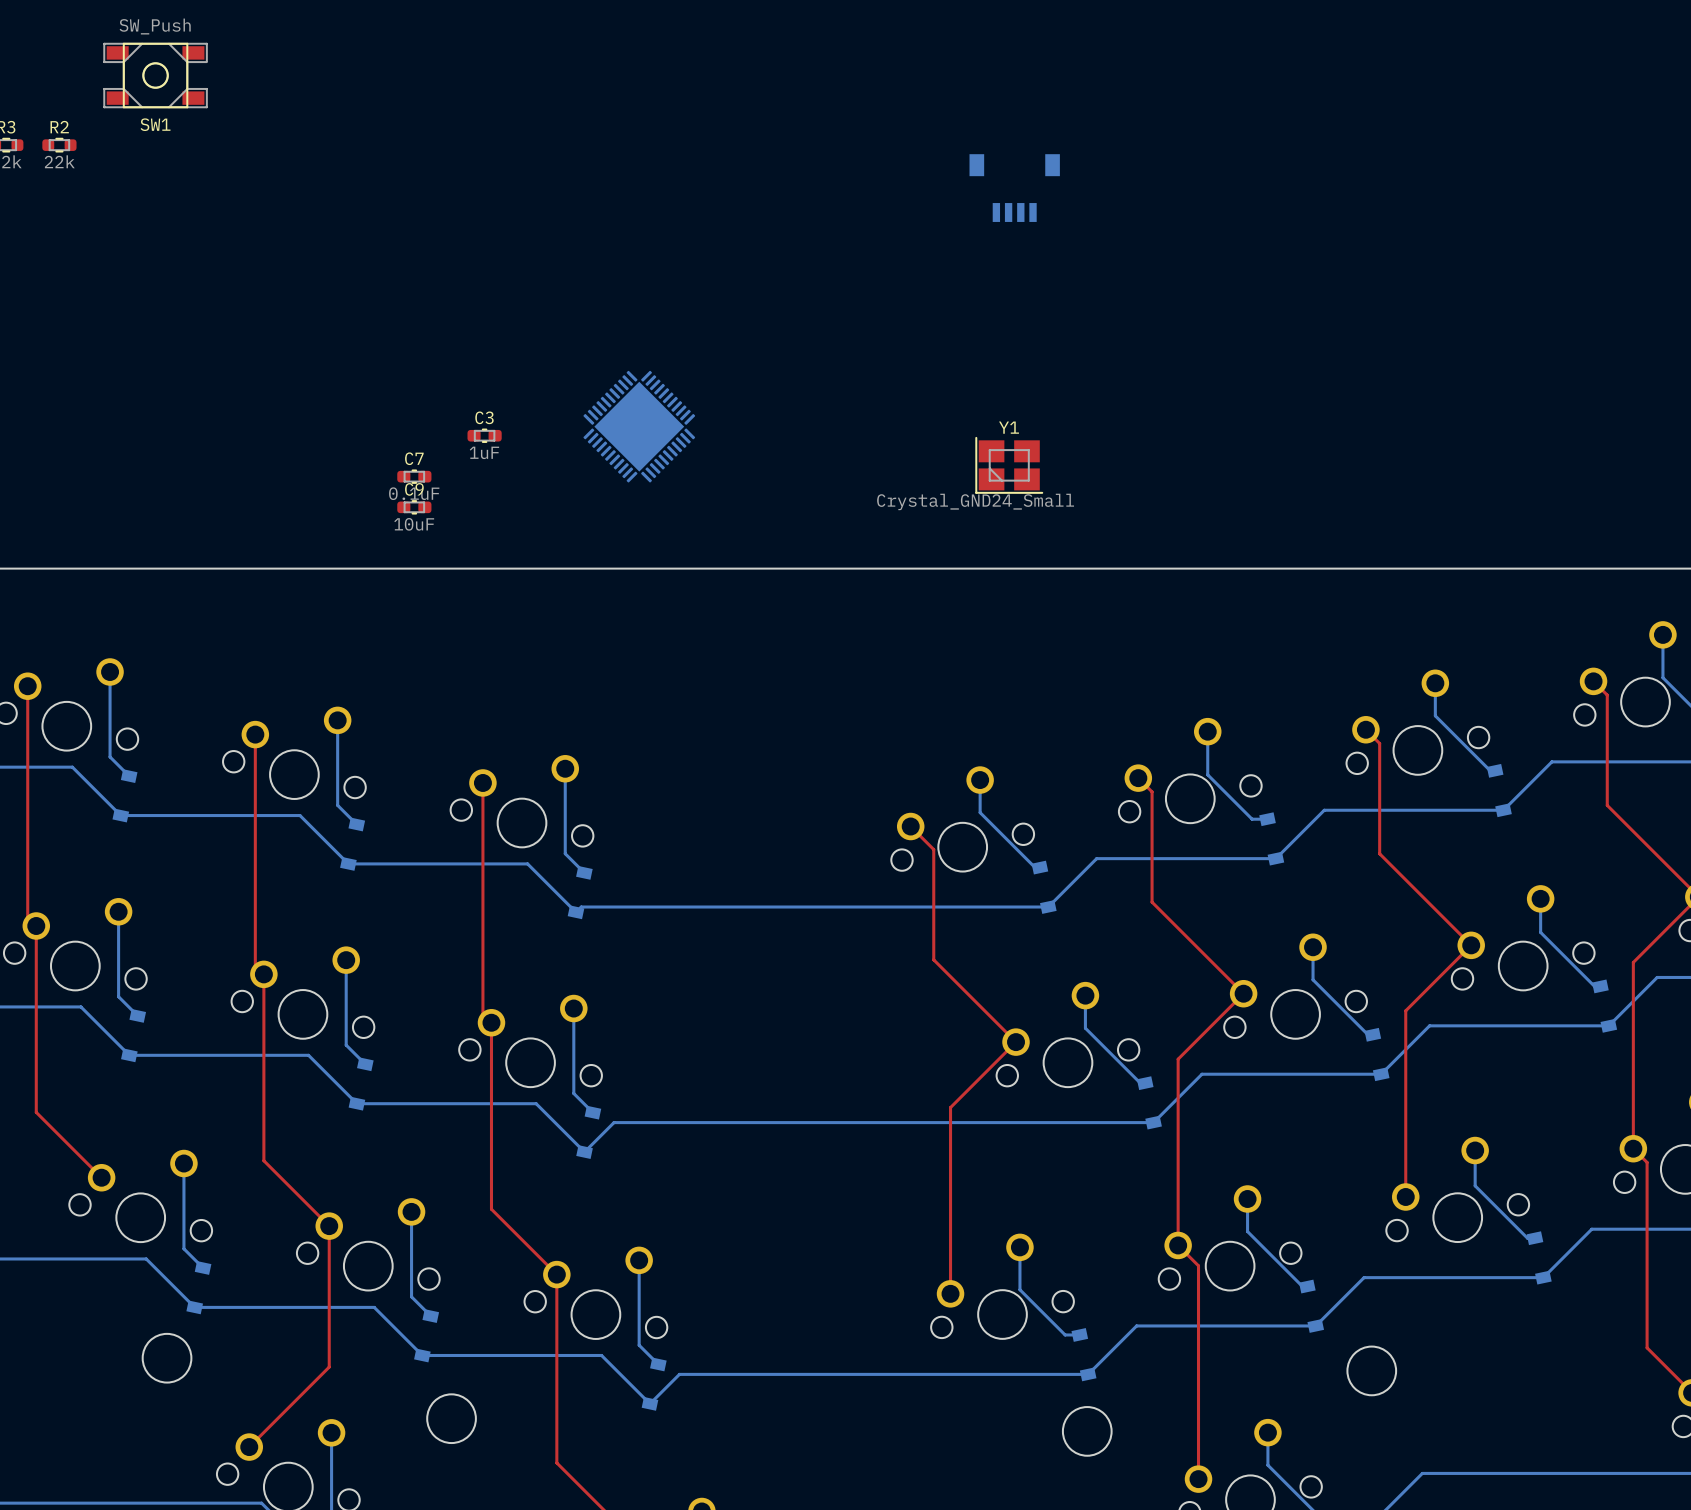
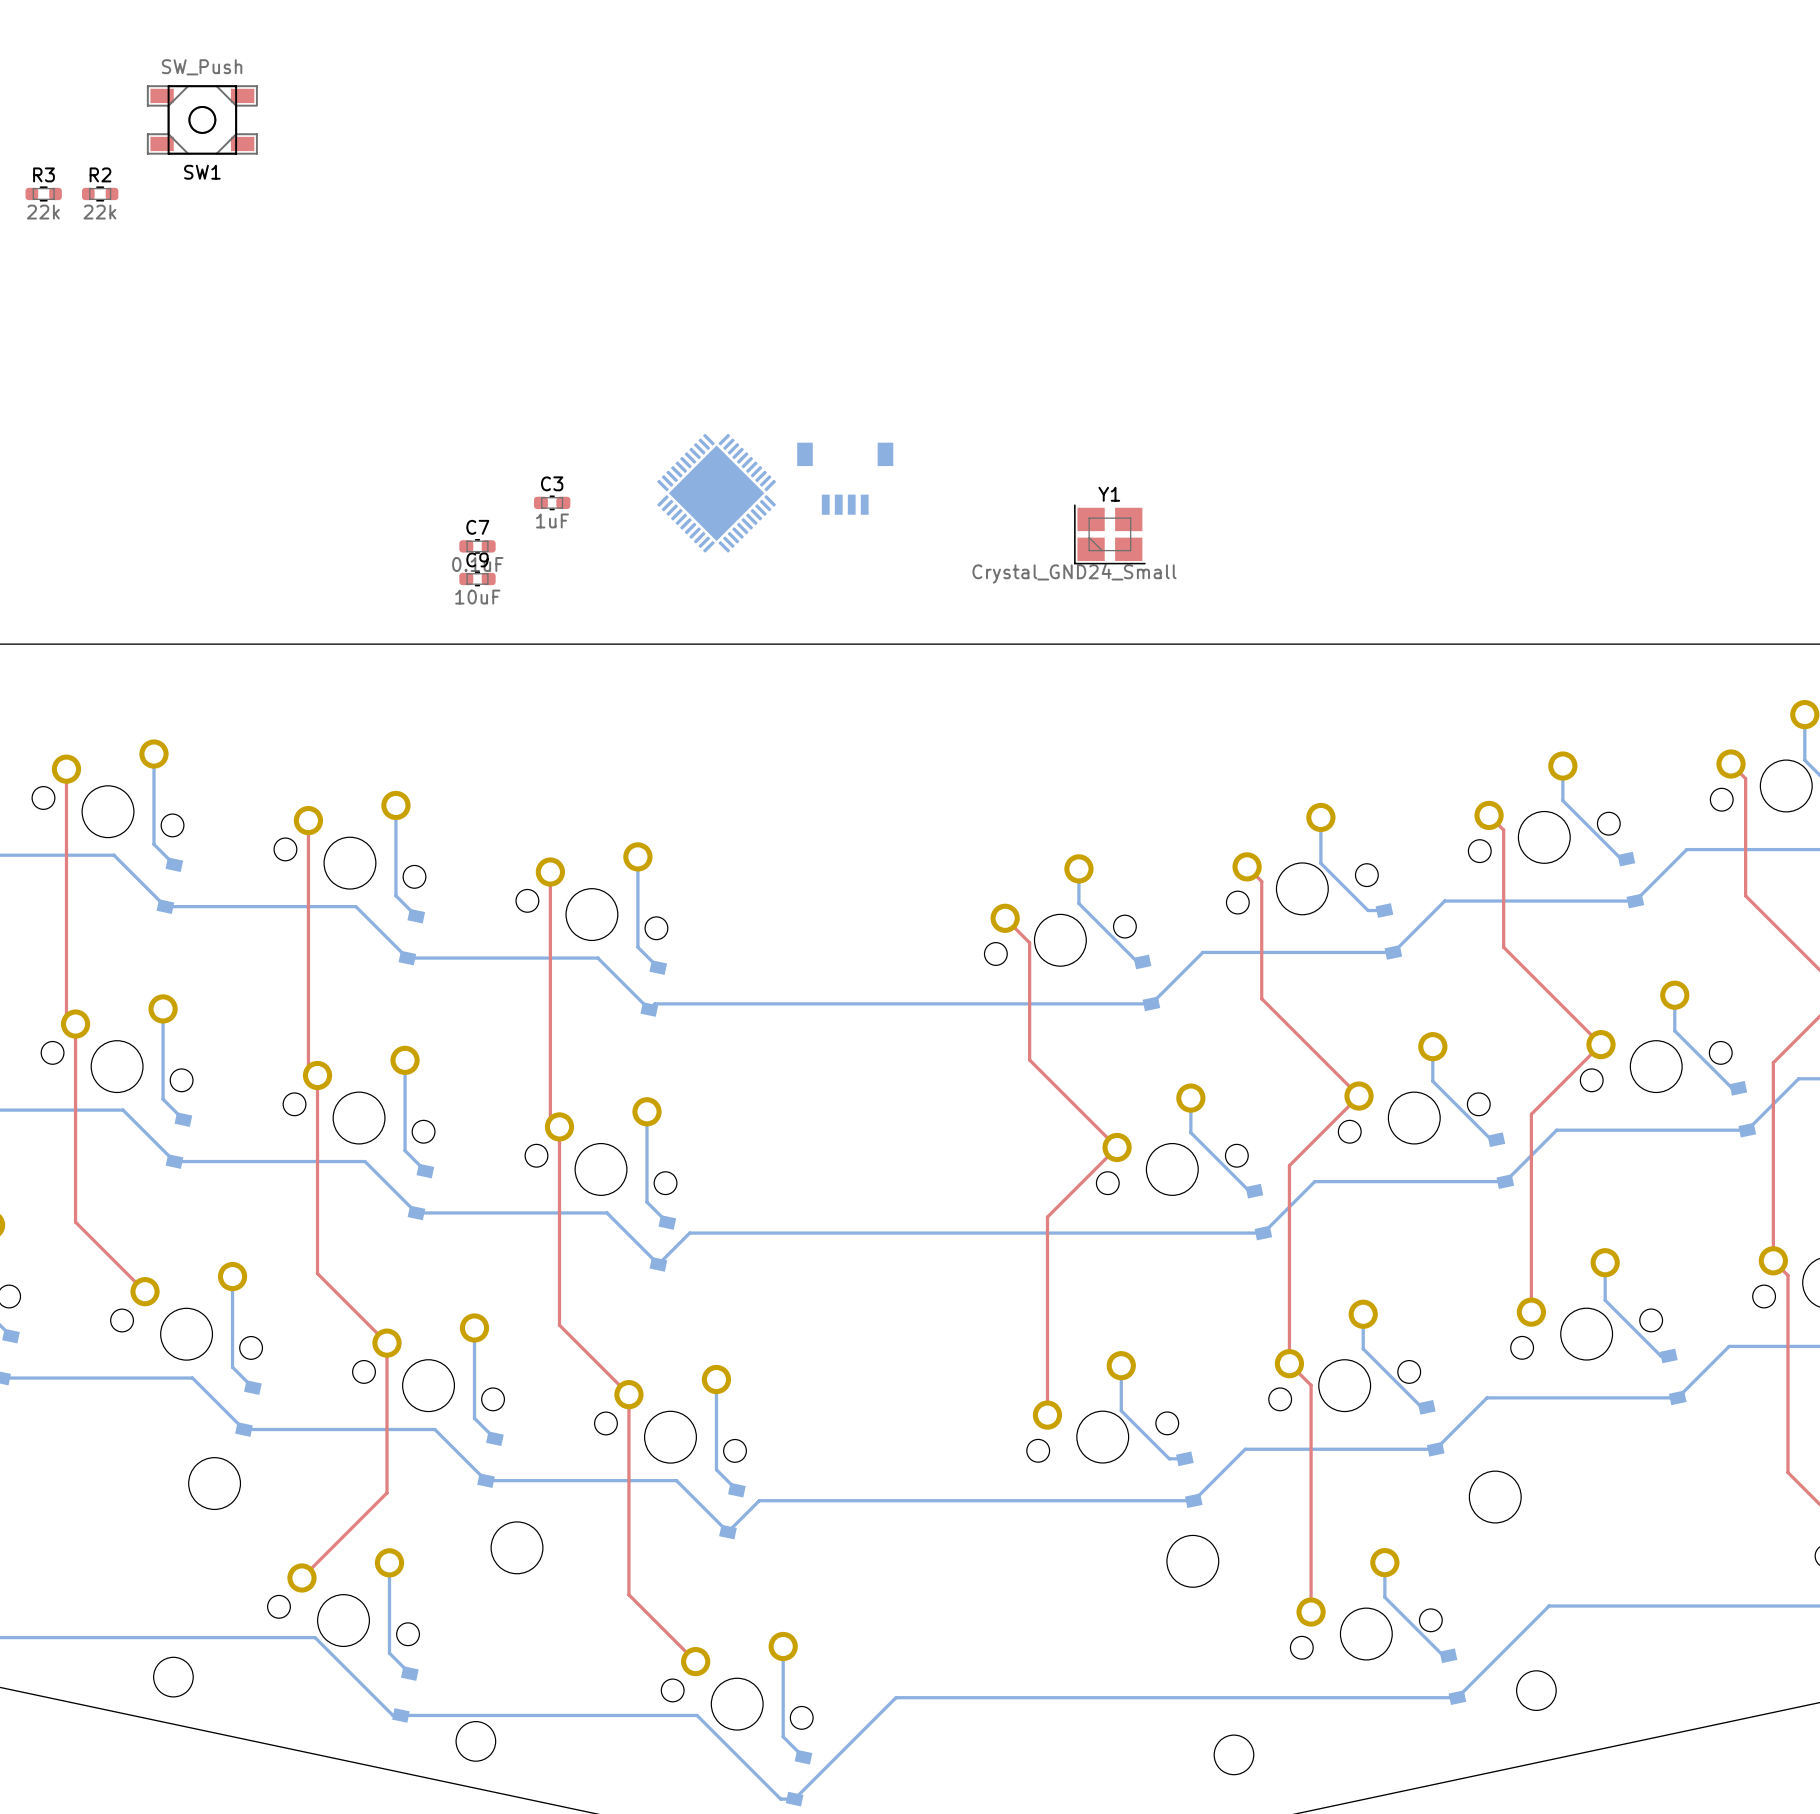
part: (1014, 188) -> none
part: none -> (845, 478)

